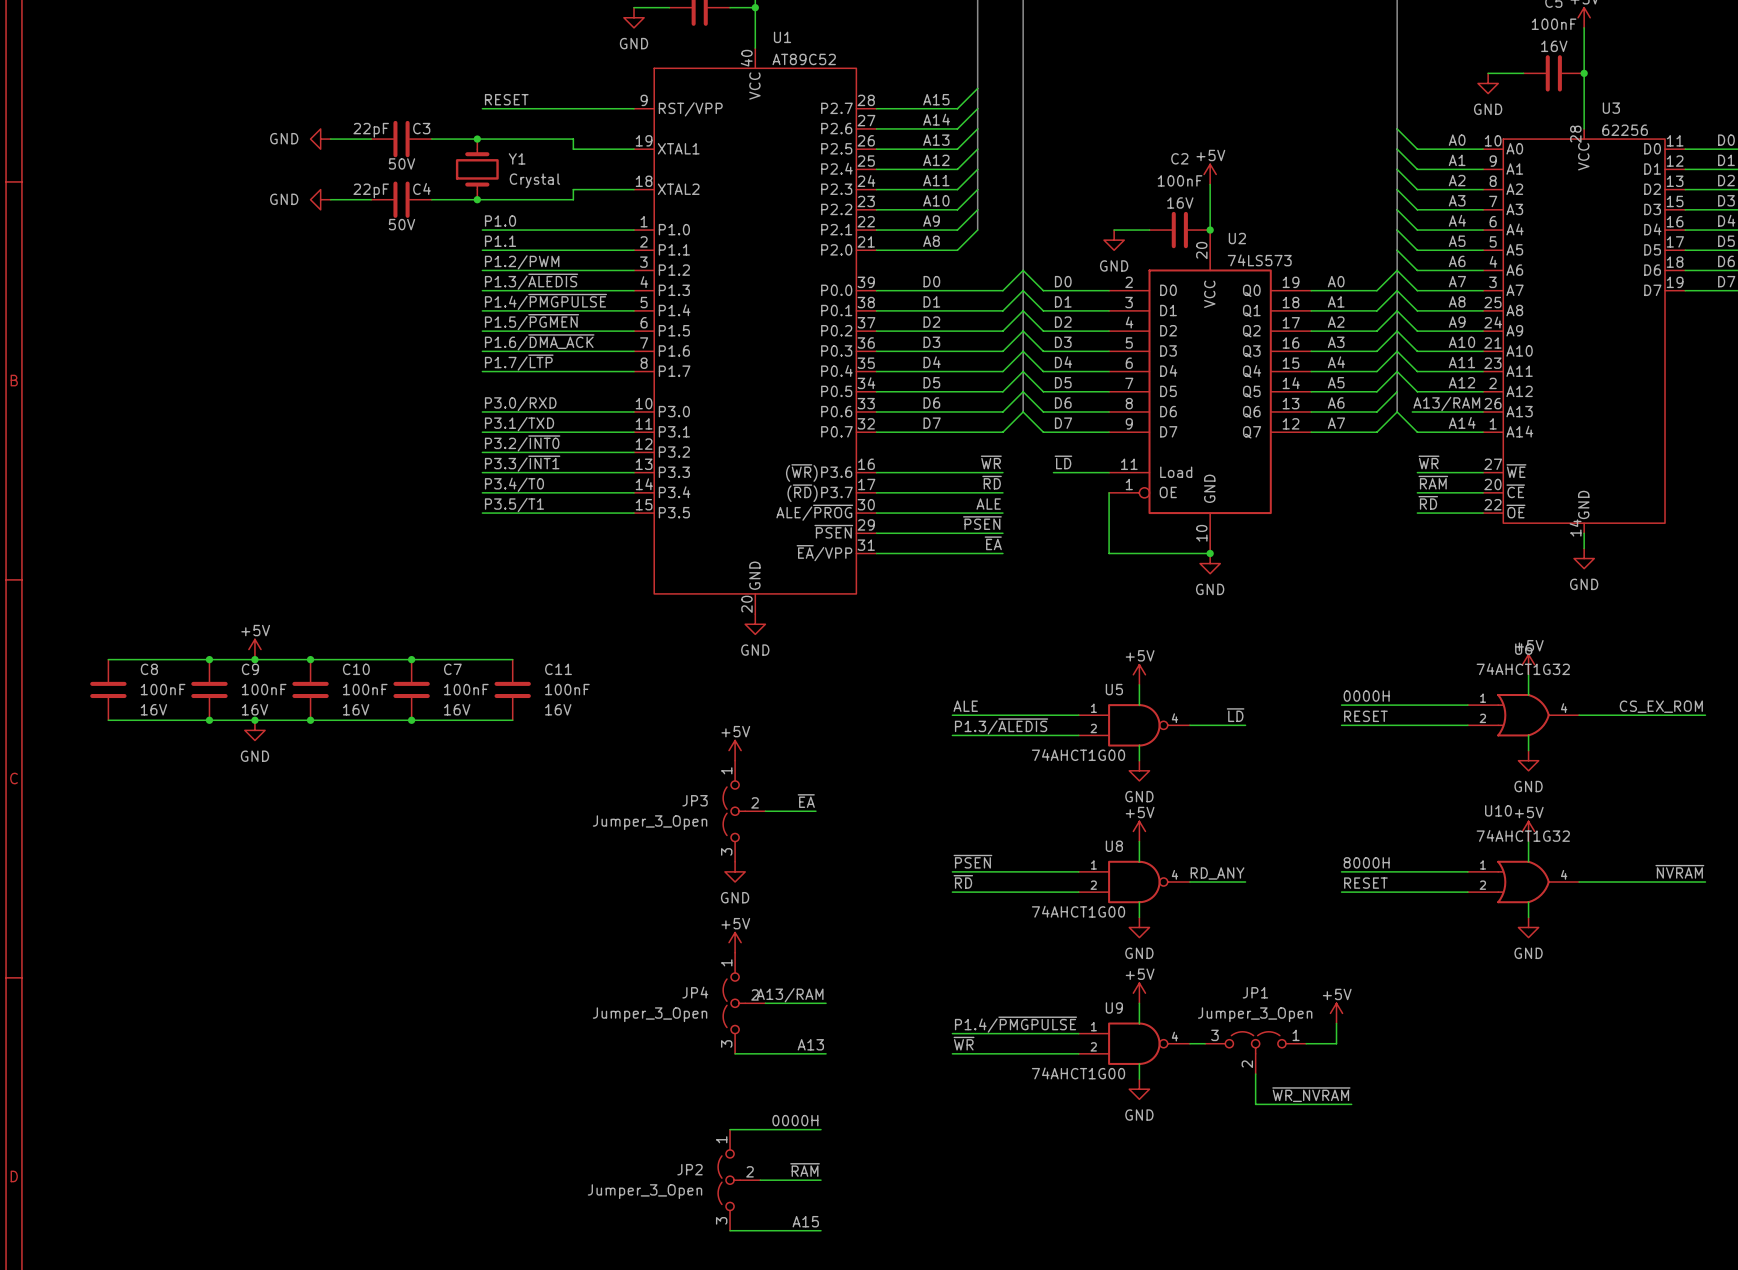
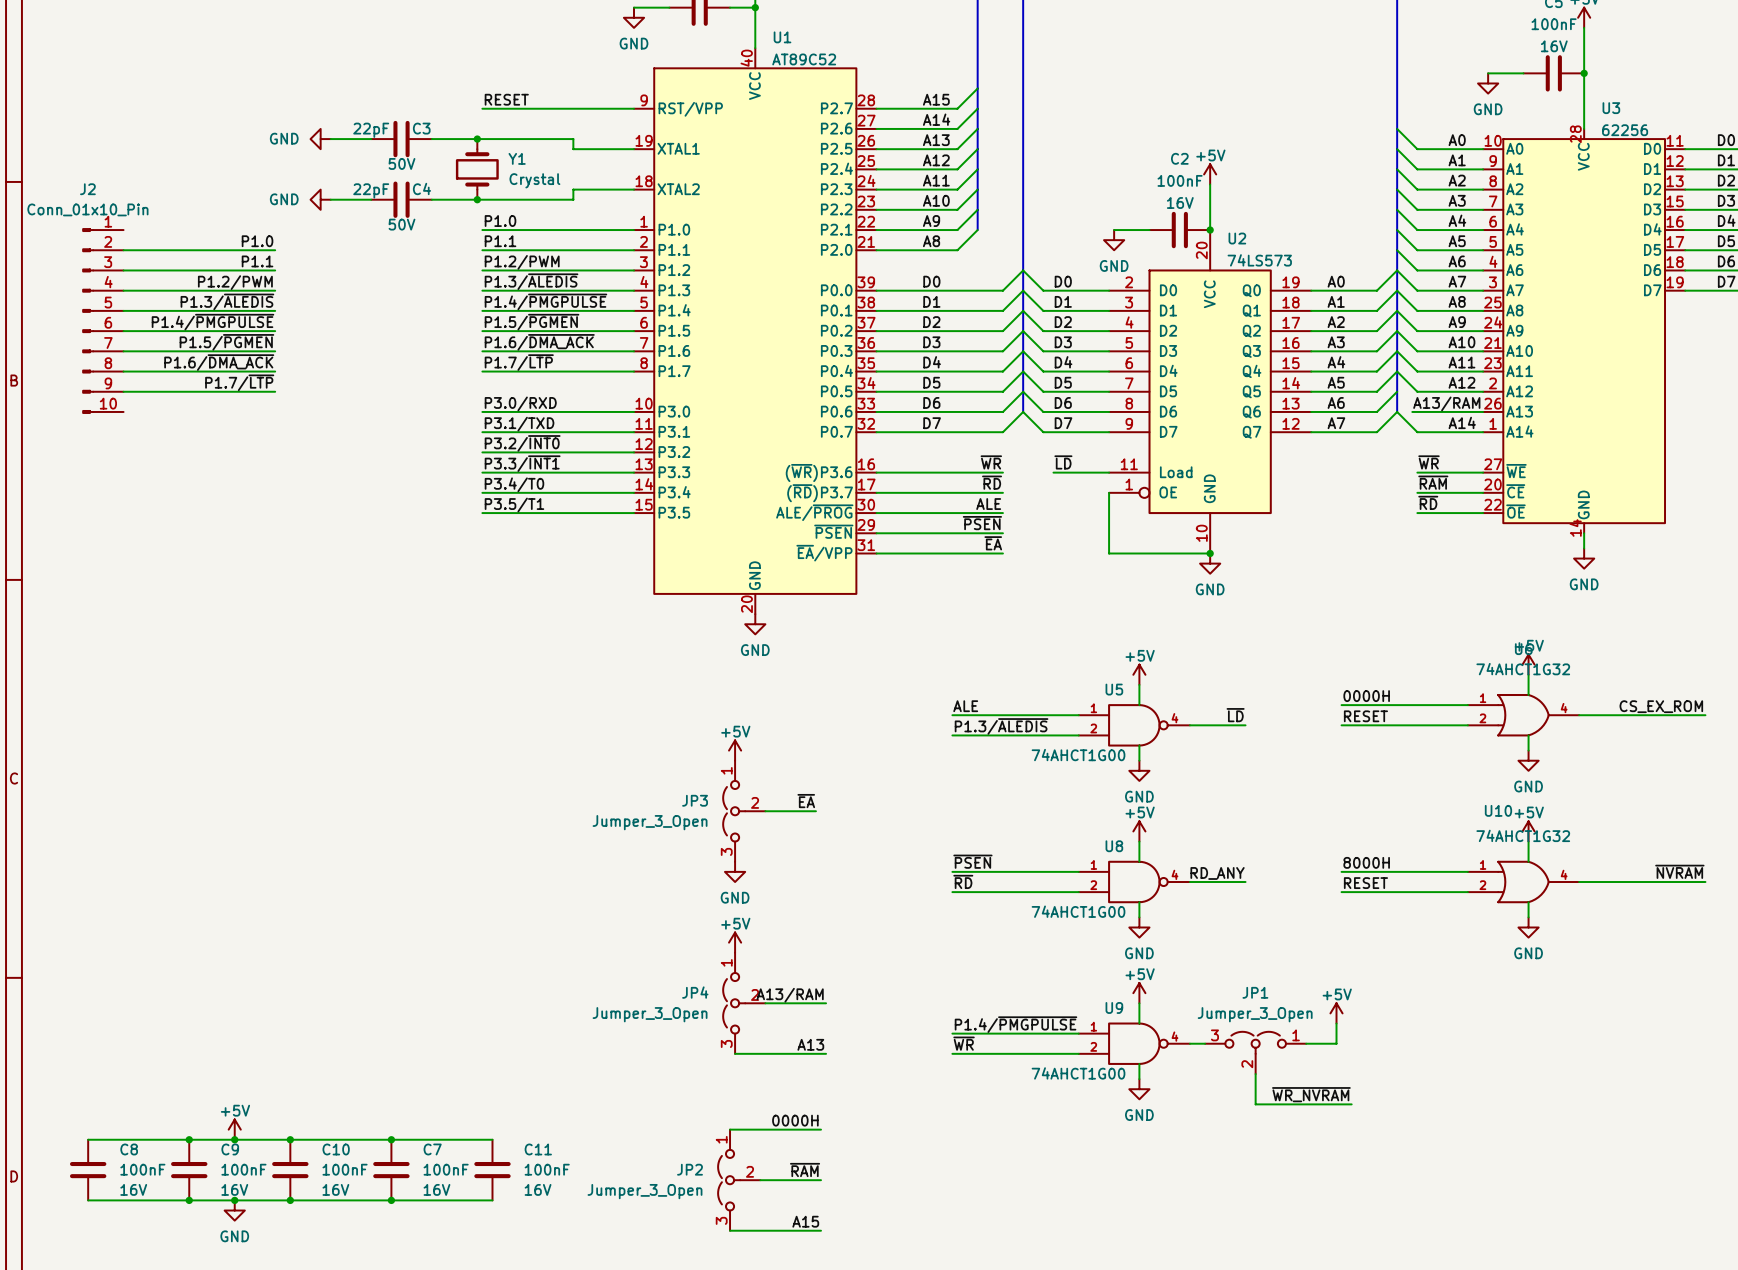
label: none -> P1.0 (257, 241)
wire: none -> (123, 250) (275, 250)
label: none -> P1.1 (257, 261)
wire: none -> (123, 270) (275, 270)
label: none -> P1.2/PWM (235, 282)
wire: none -> (123, 290) (275, 290)
label: none -> P1.3/~{ALEDIS} (227, 301)
wire: none -> (123, 310) (275, 310)
J2: none -> Conn_01x10_Pin (103, 321)
label: none -> P1.4/~{PMGPULSE} (212, 322)
wire: none -> (123, 331) (275, 331)
label: none -> P1.5/~{PGMEN} (226, 342)
wire: none -> (123, 351) (275, 351)
label: none -> P1.6/~{DMA_ACK} (219, 362)
wire: none -> (123, 371) (275, 371)
label: none -> P1.7/~{LTP} (239, 382)
wire: none -> (123, 391) (275, 391)
power symbol: +5V (254, 649) -> none
wire: (108, 659) (512, 659) -> none
junction: (209, 659) -> none
junction: (254, 659) -> none
junction: (310, 659) -> none
junction: (411, 659) -> none
C8 position: (108, 689) -> (88, 1170)
C9 position: (209, 689) -> (189, 1170)
C10 position: (310, 689) -> (290, 1170)
C7 position: (411, 689) -> (391, 1170)
C11 position: (512, 689) -> (492, 1170)
wire: (108, 720) (512, 720) -> none
junction: (209, 720) -> none
junction: (254, 720) -> none
junction: (310, 720) -> none
junction: (411, 720) -> none
power symbol: GND (254, 730) -> none
power symbol: none -> +5V (234, 1129)
wire: none -> (88, 1139) (492, 1139)
junction: none -> (189, 1139)
junction: none -> (234, 1139)
junction: none -> (290, 1139)
junction: none -> (391, 1139)
wire: none -> (88, 1200) (492, 1200)
junction: none -> (189, 1200)
junction: none -> (234, 1200)
junction: none -> (290, 1200)
junction: none -> (391, 1200)
power symbol: none -> GND (234, 1210)

